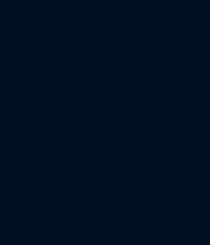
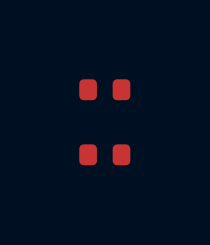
part: none -> (104, 89)
part: none -> (104, 154)

